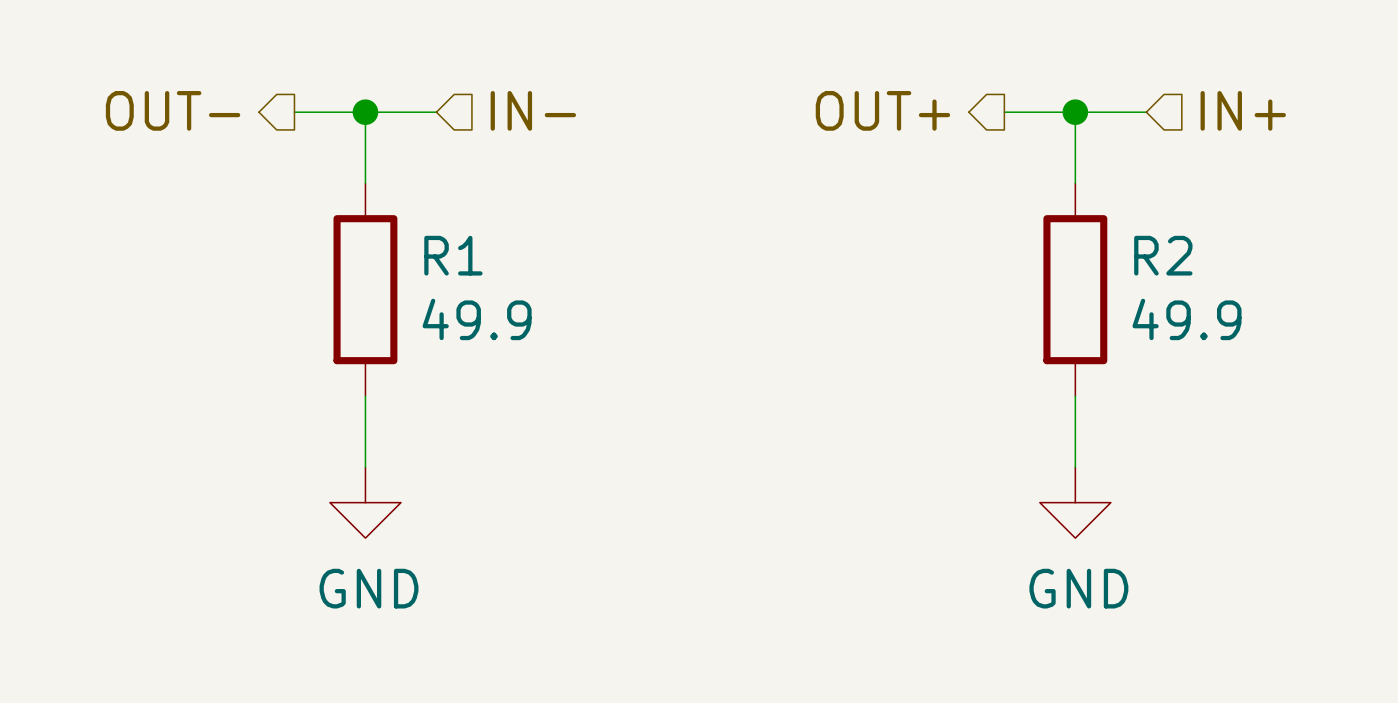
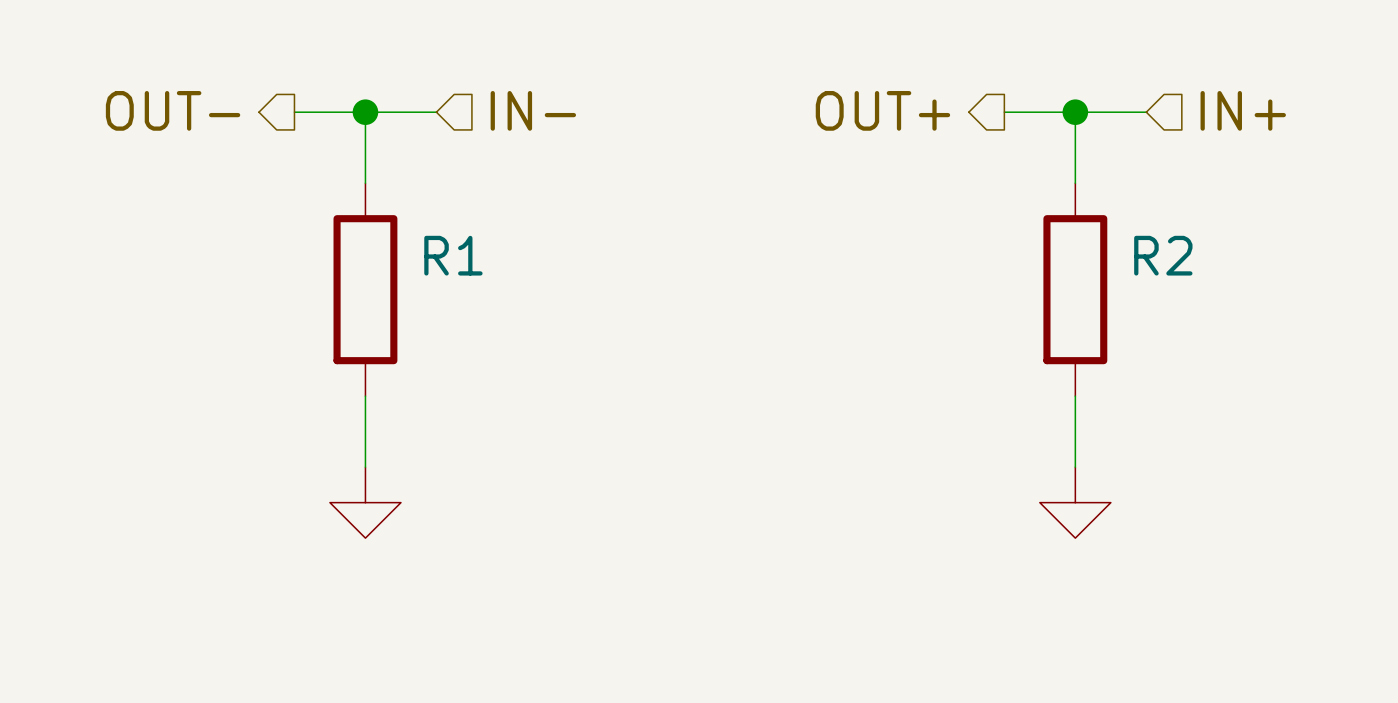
R1 value: 49.9 (477, 319) -> none
R2 value: 49.9 (1187, 319) -> none
power symbol text: GND (369, 588) -> none
power symbol text: GND (1078, 588) -> none

